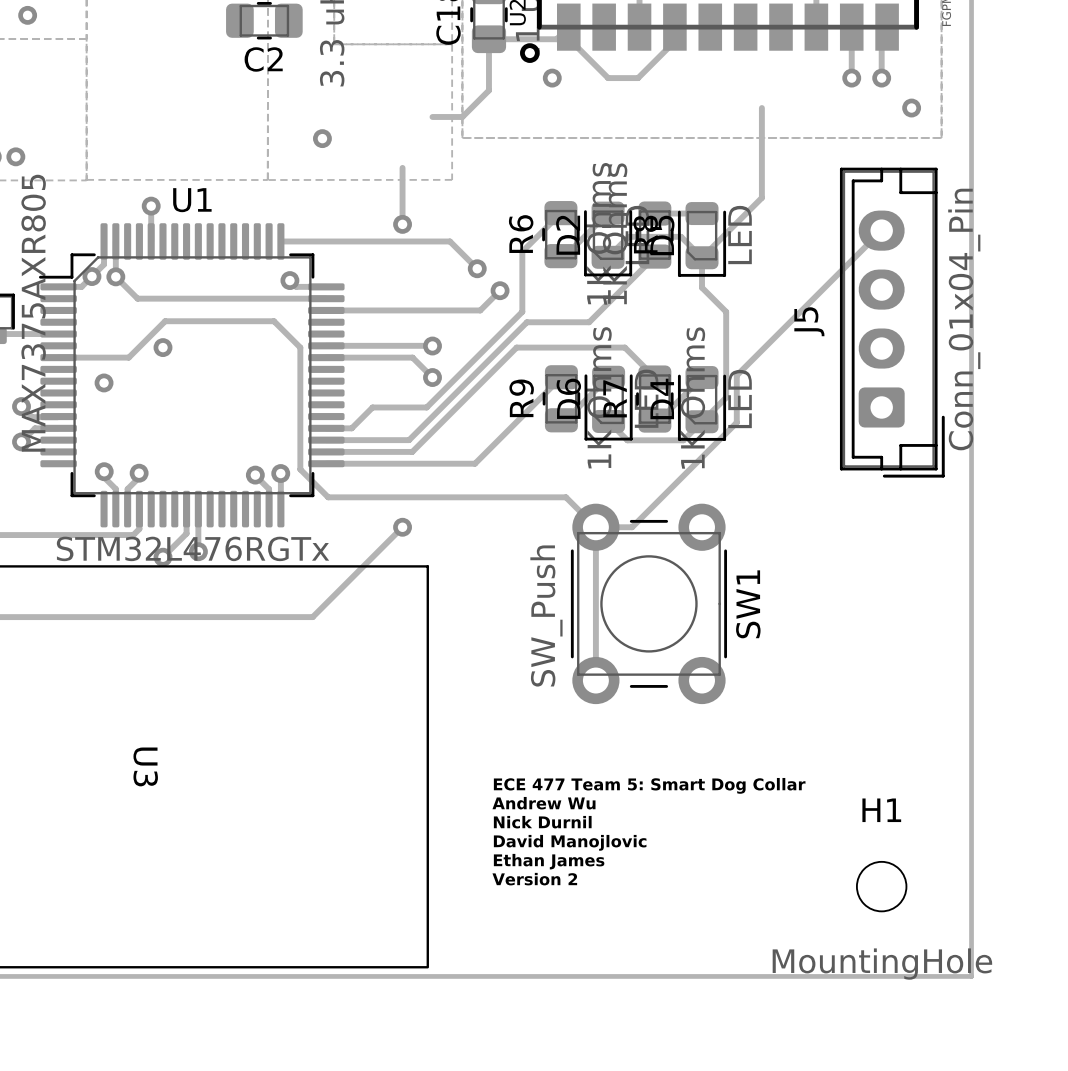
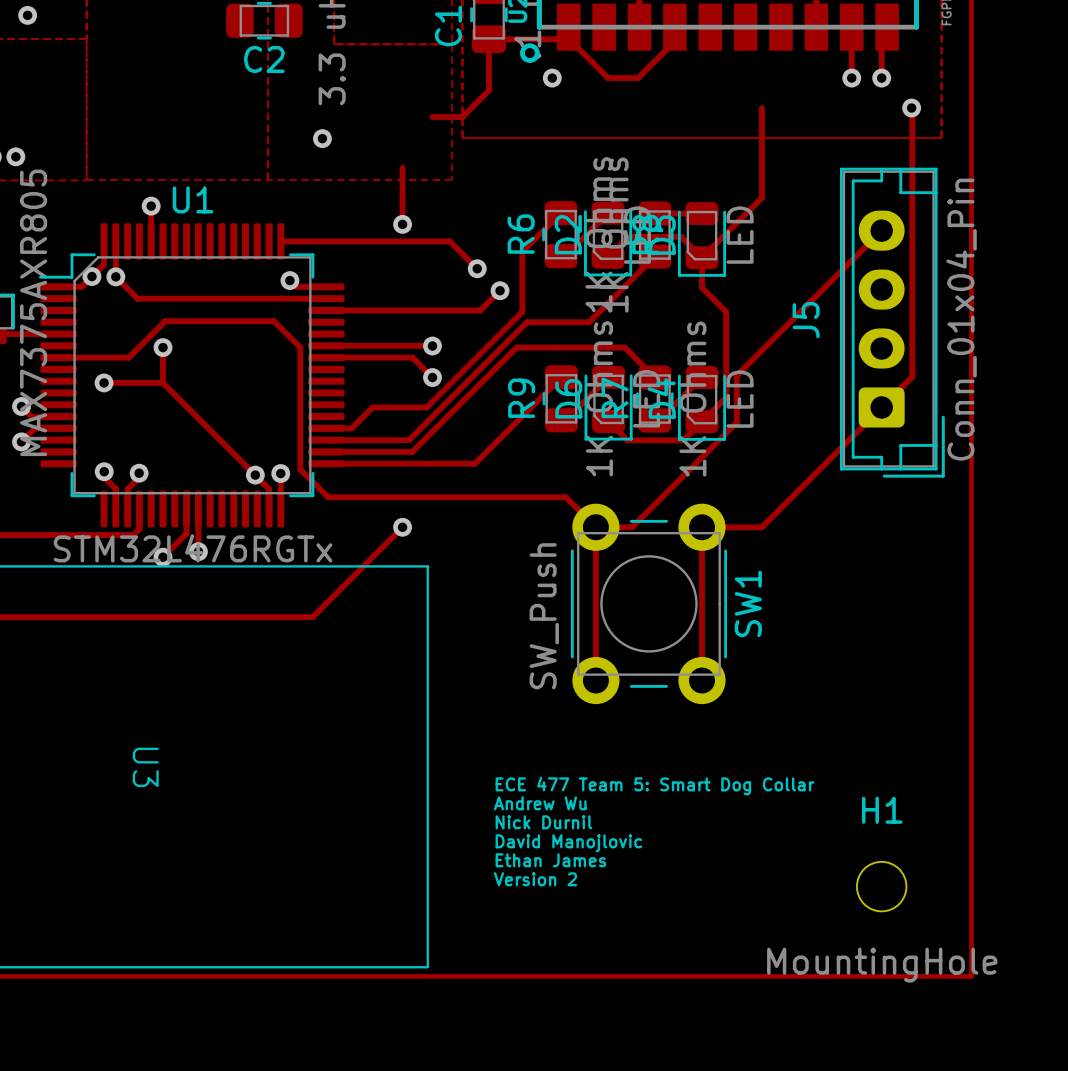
track: none -> (912, 108) (912, 376) (761, 527) (702, 527) (702, 680)
track: none -> (162, 347) (162, 382)
track: none -> (104, 382) (162, 382)
track: none -> (162, 382) (255, 475)

